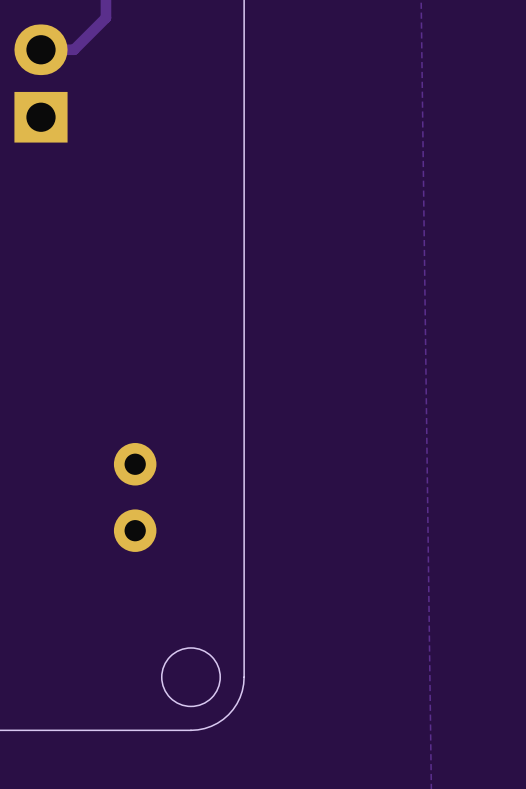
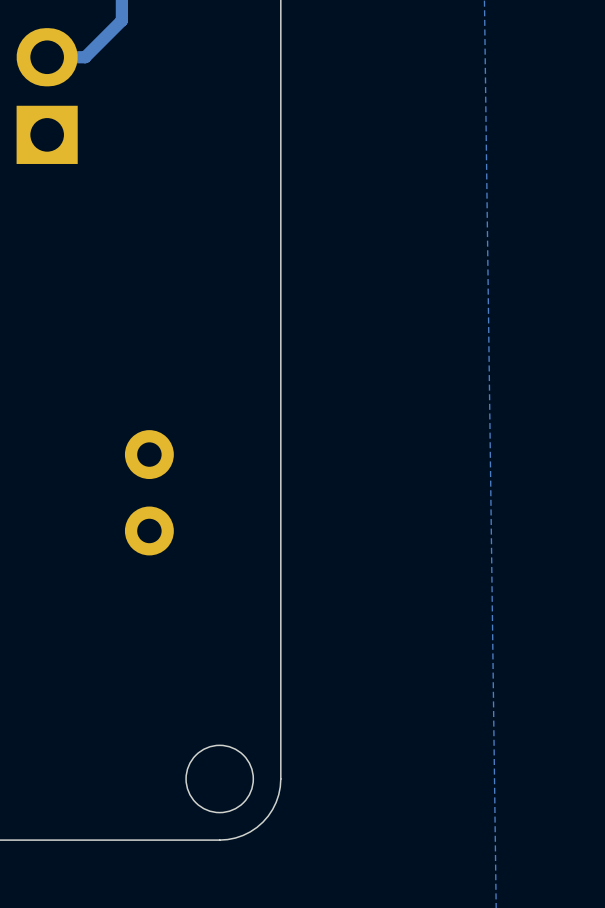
part position: (135, 497) -> (149, 492)

